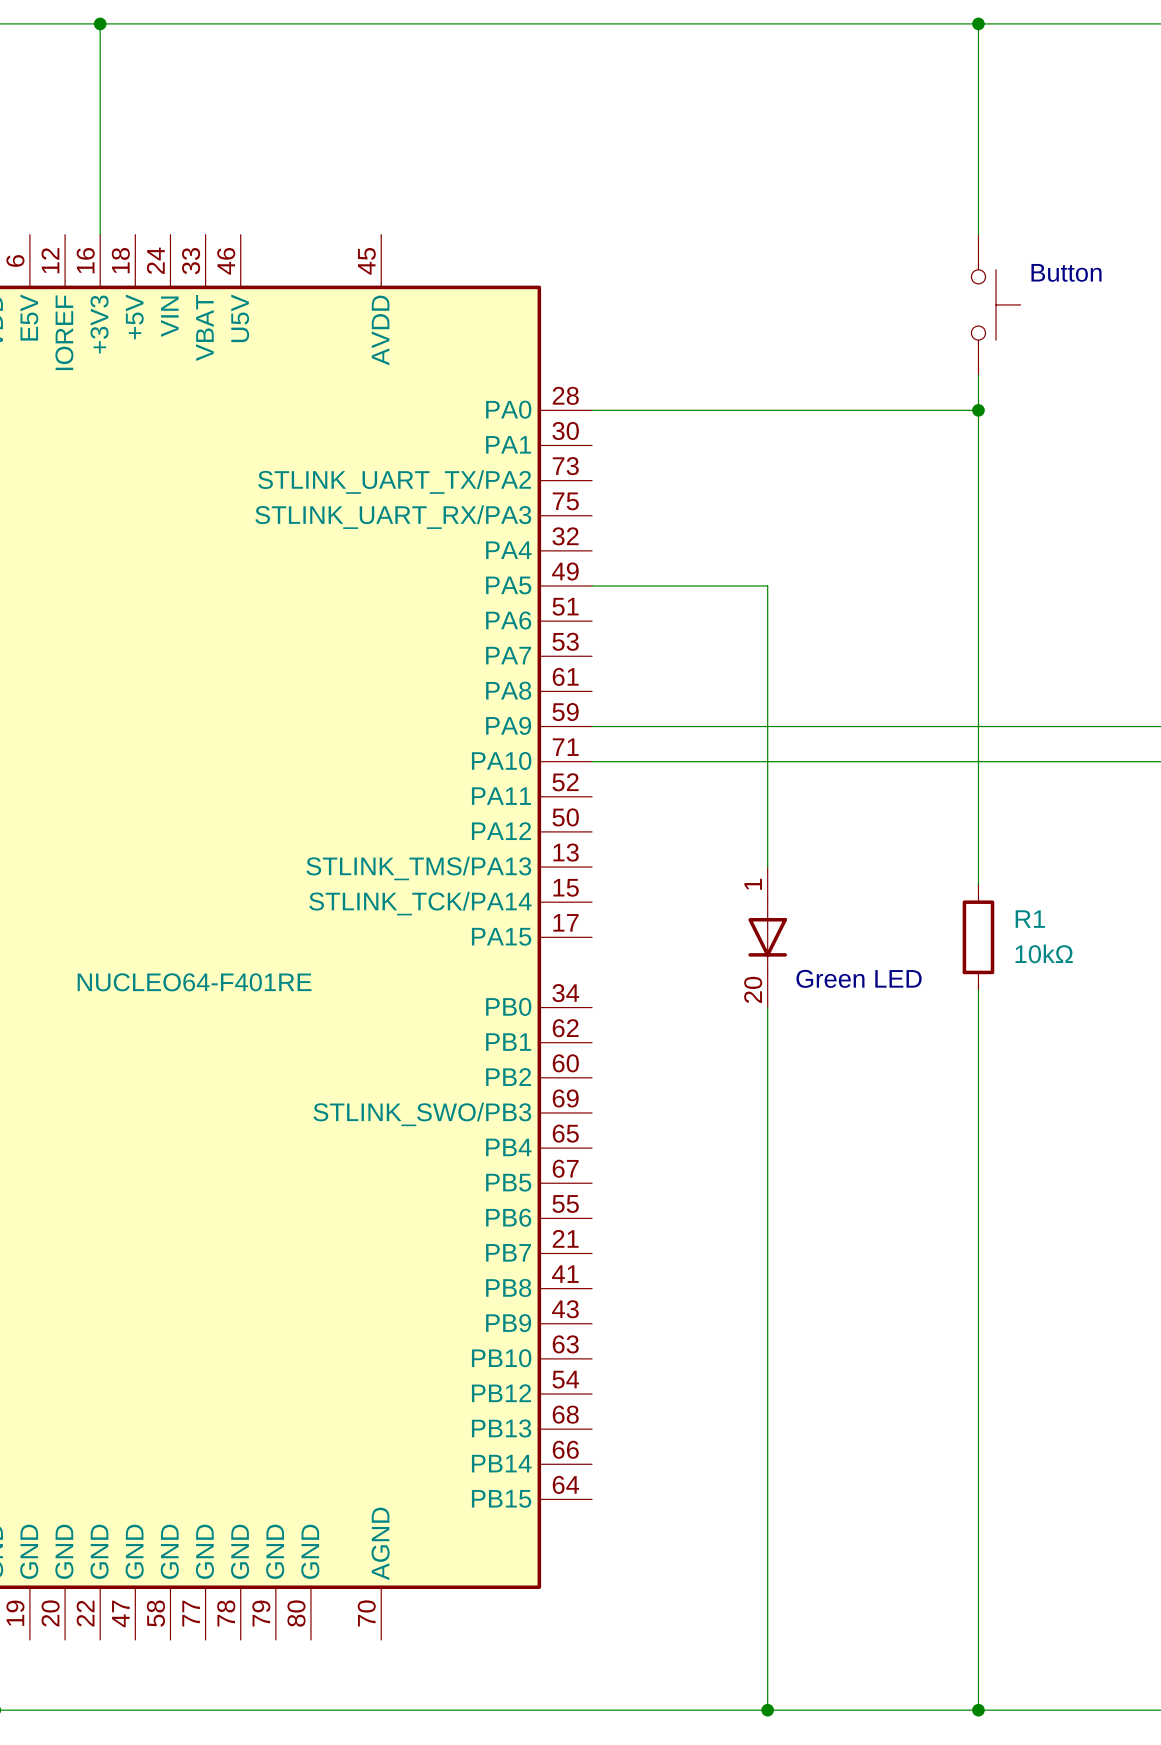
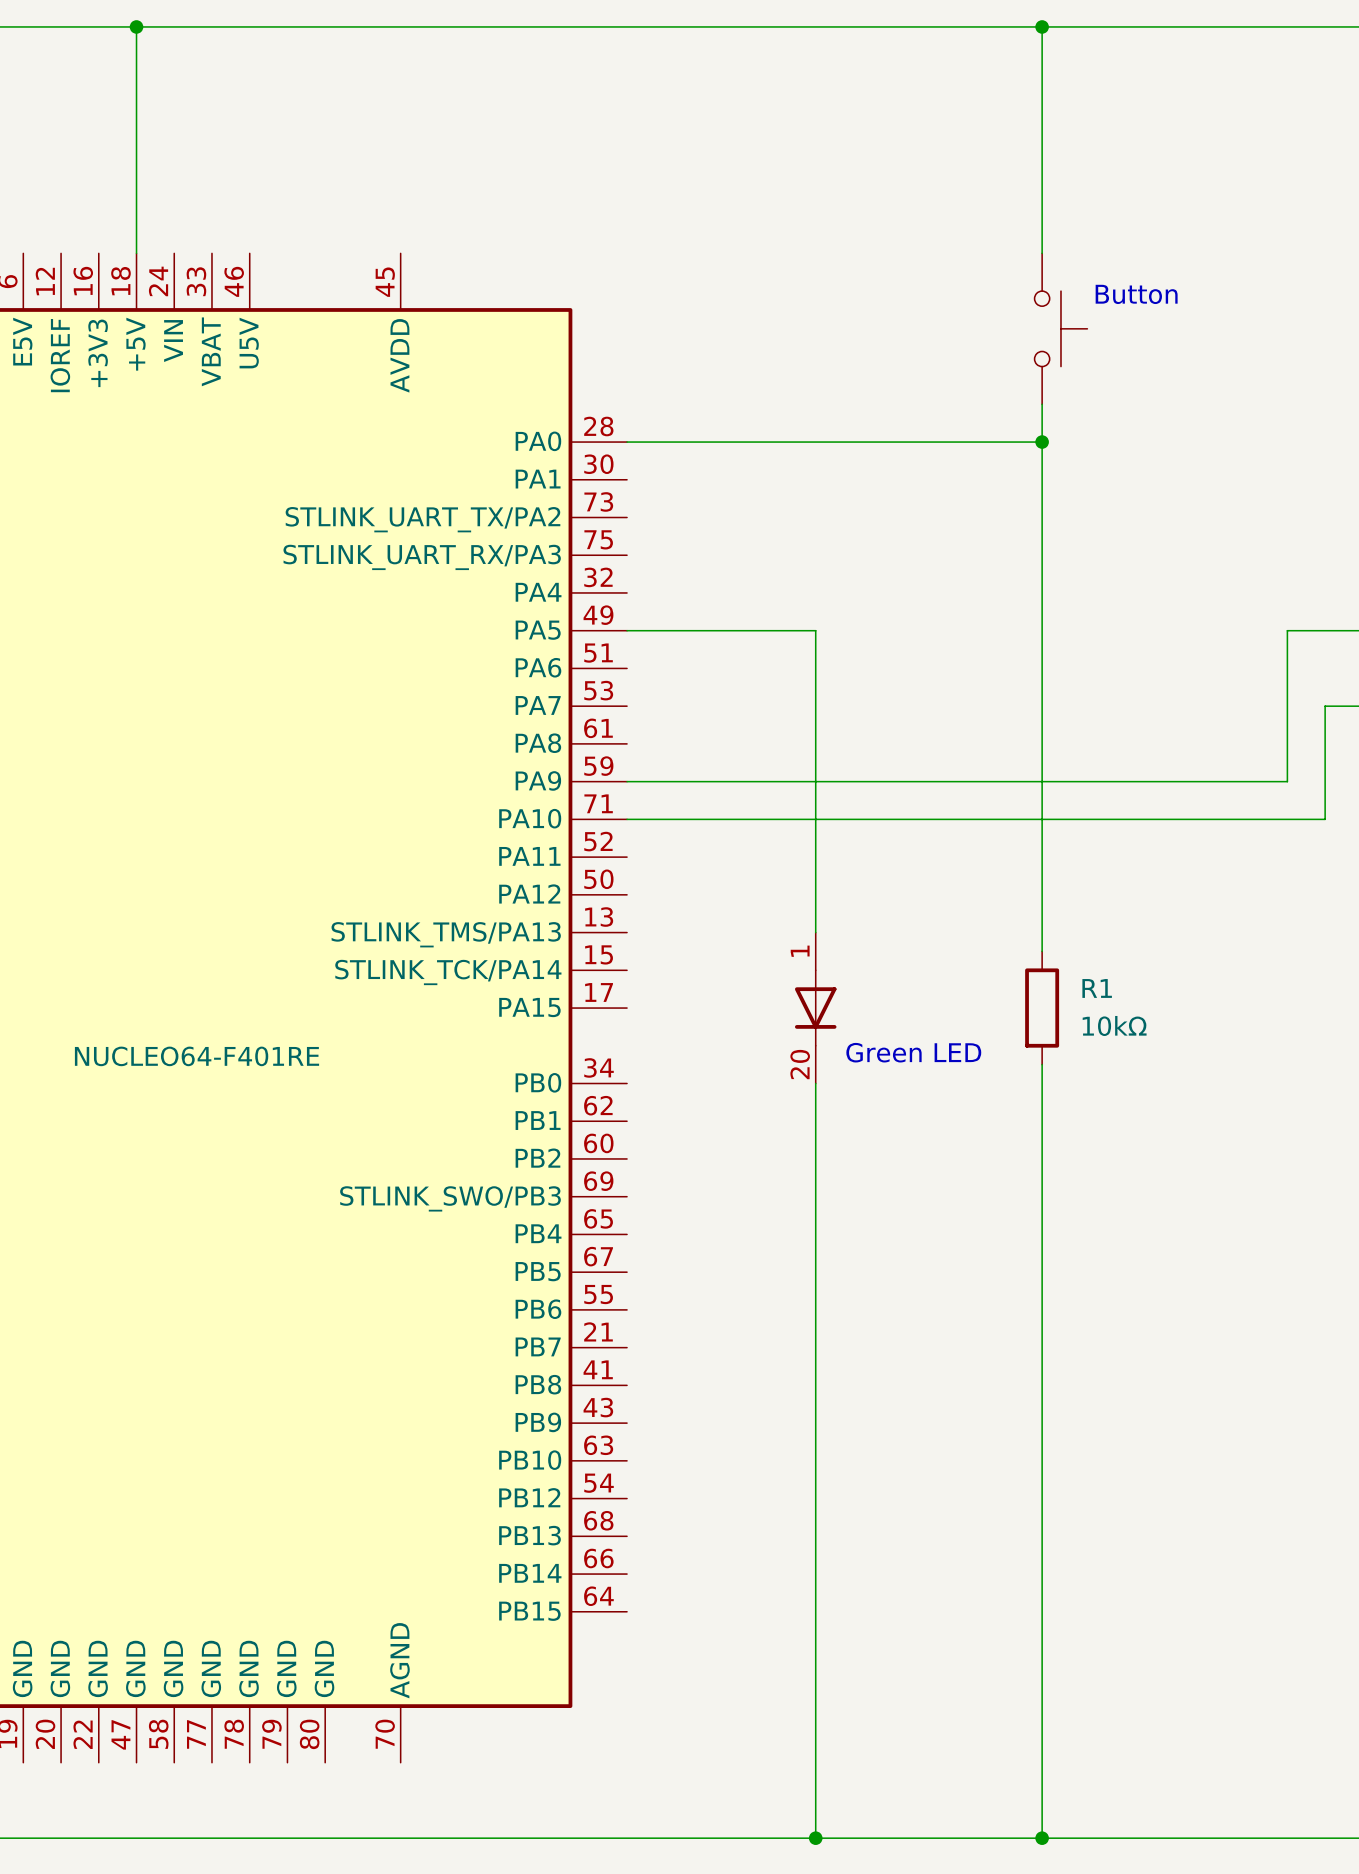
wire: (100, 23) (100, 234) -> (136, 26) (136, 253)
junction position: (100, 23) -> (136, 26)

